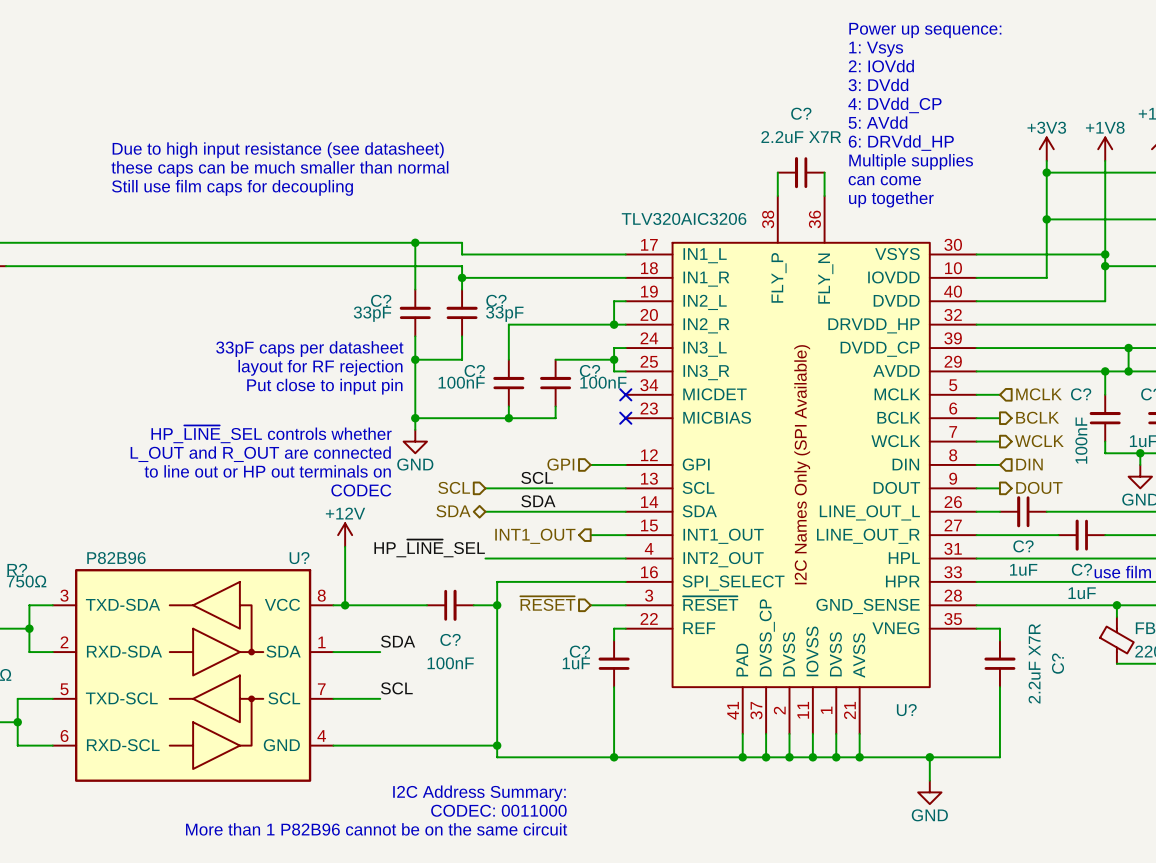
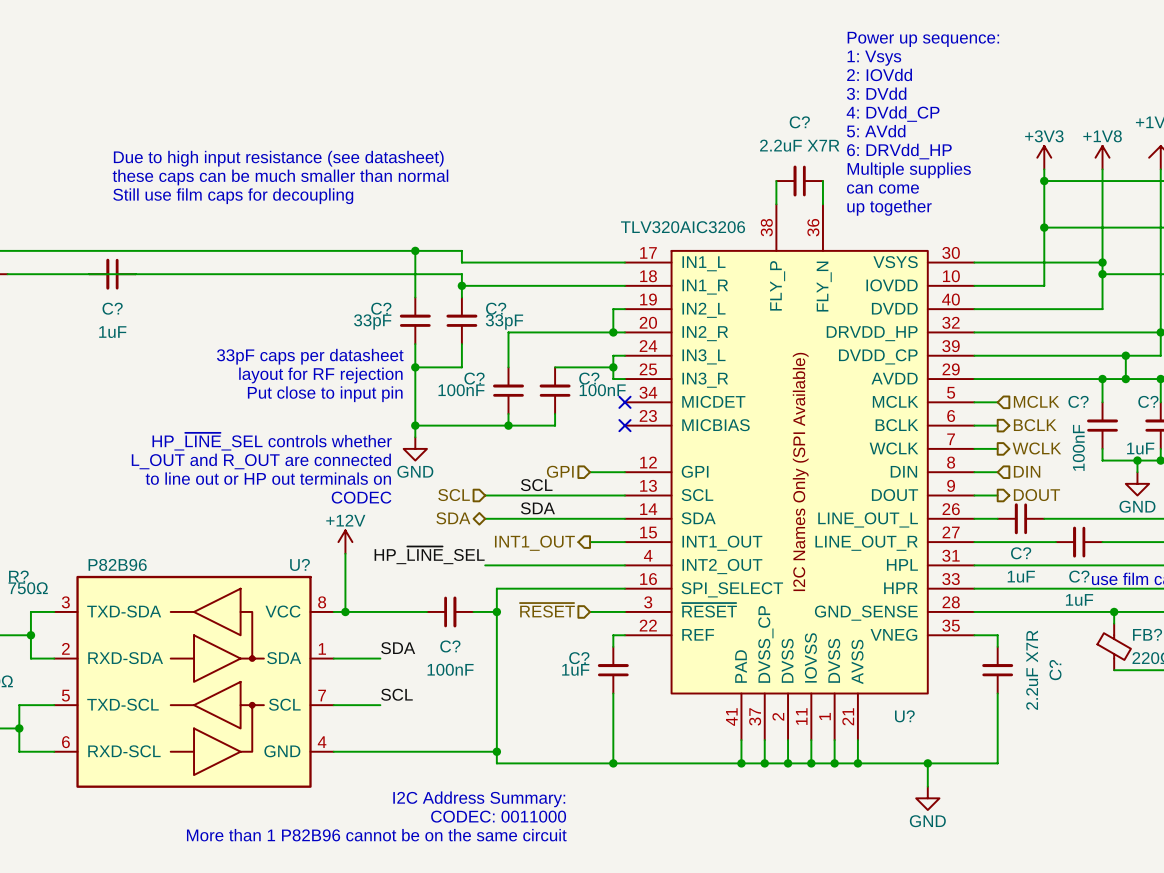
C?: none -> 1uF (112, 274)

